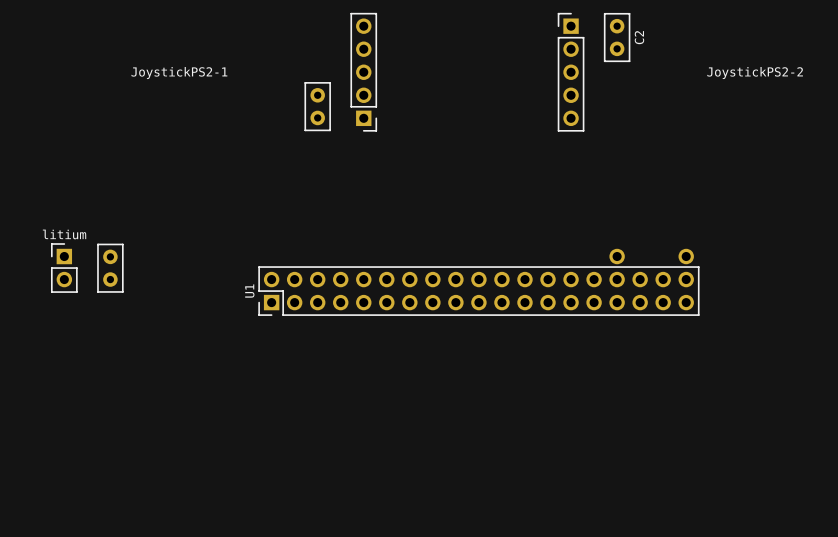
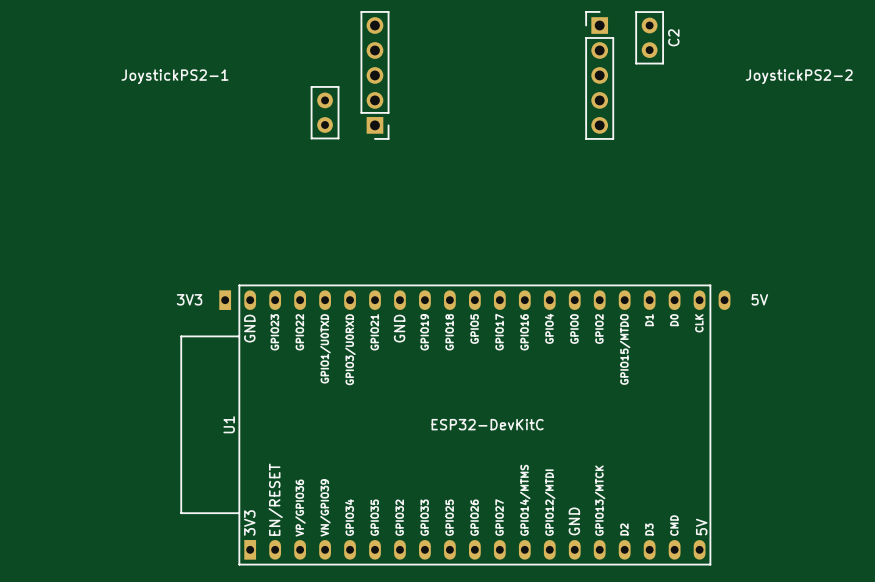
part: (617, 256) -> none
part: (686, 256) -> none
U1 footprint: [258, 266, 700, 316] -> [180, 284, 711, 566]
litium: (64, 268) -> none
part: (110, 268) -> none
text: none -> 3V3 (189, 299)
part: none -> (225, 300)
part: none -> (724, 300)
text: none -> 5V (759, 299)
U1 name position: U1 (249, 291) -> U1 (229, 424)
U1 value: none -> ESP32-DevKitC (487, 424)

